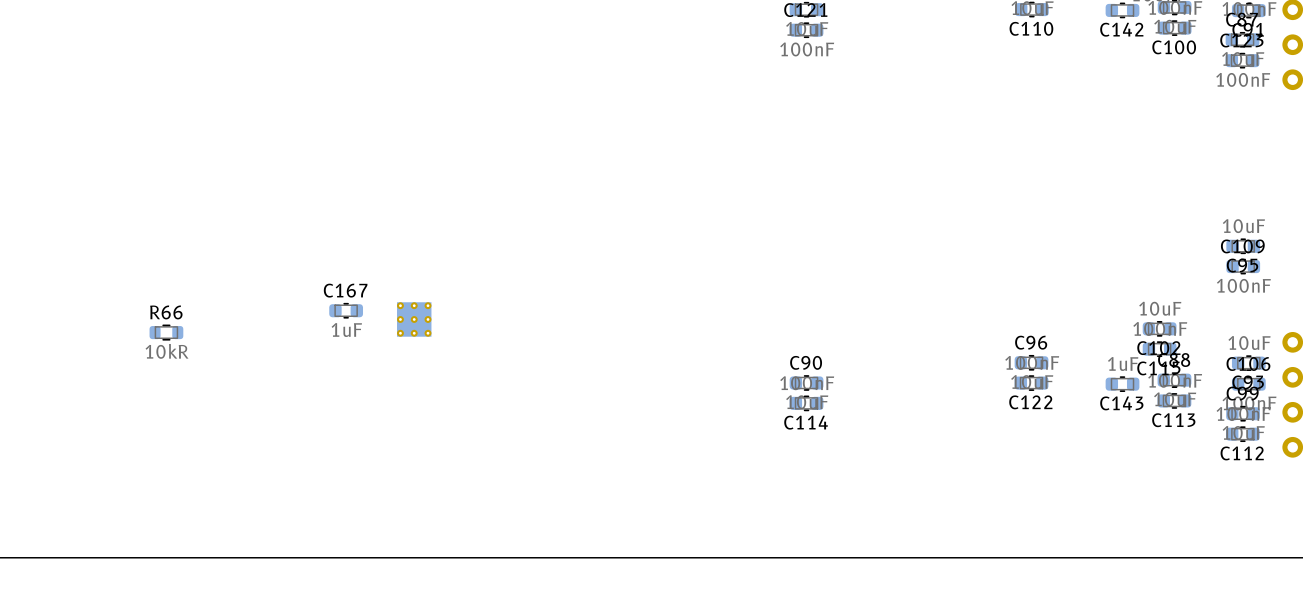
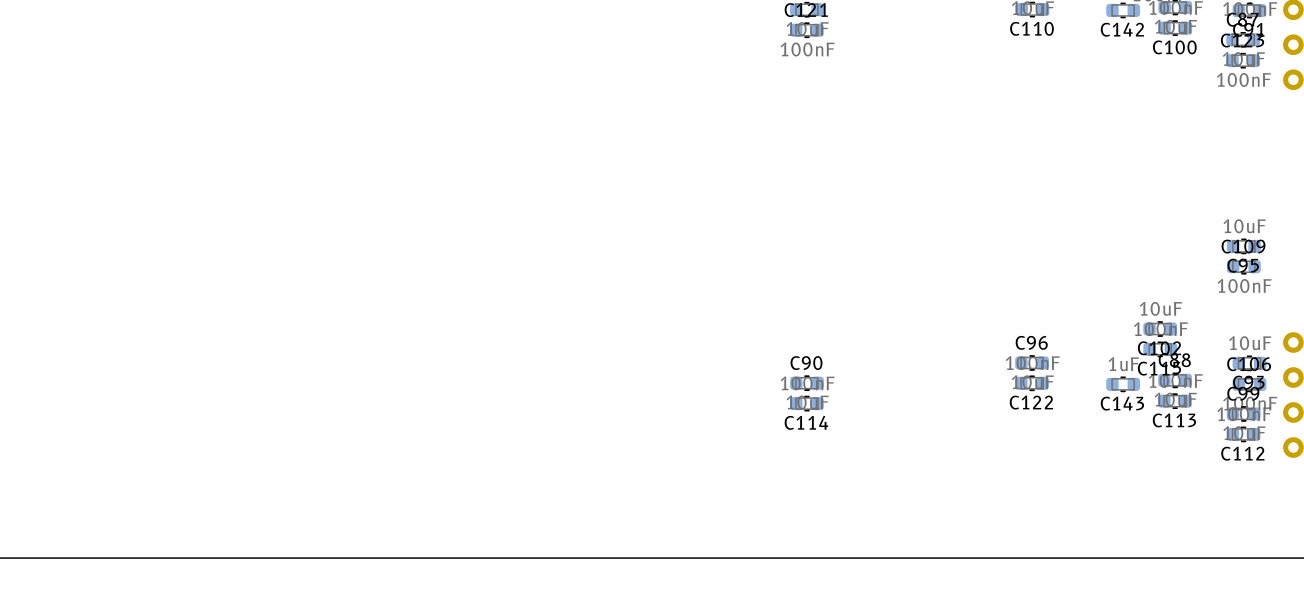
C167: 1uF (346, 310) -> none
part: (414, 319) -> none
R66: 10kR (166, 332) -> none

